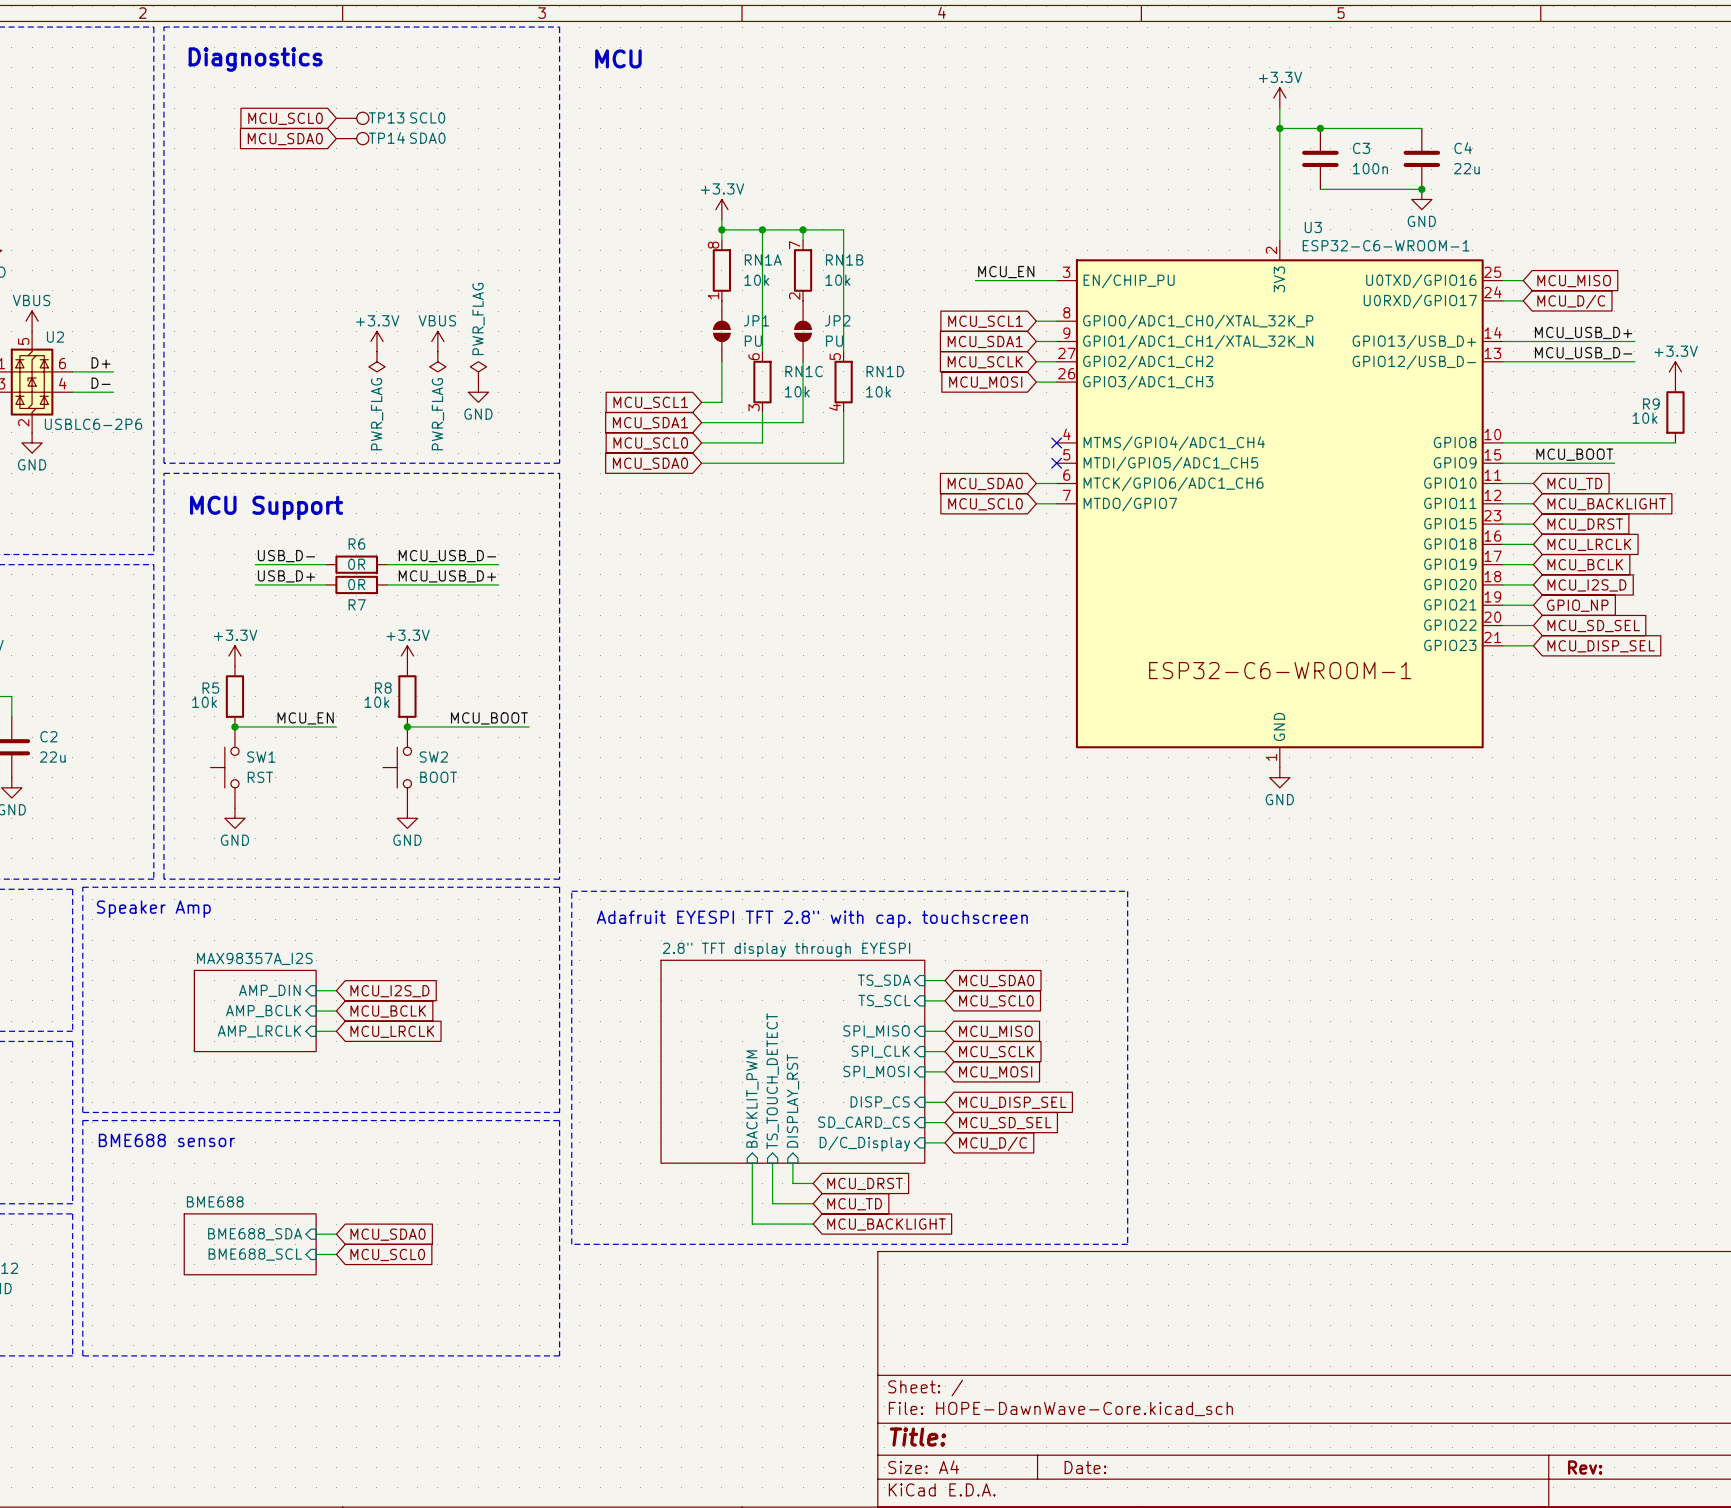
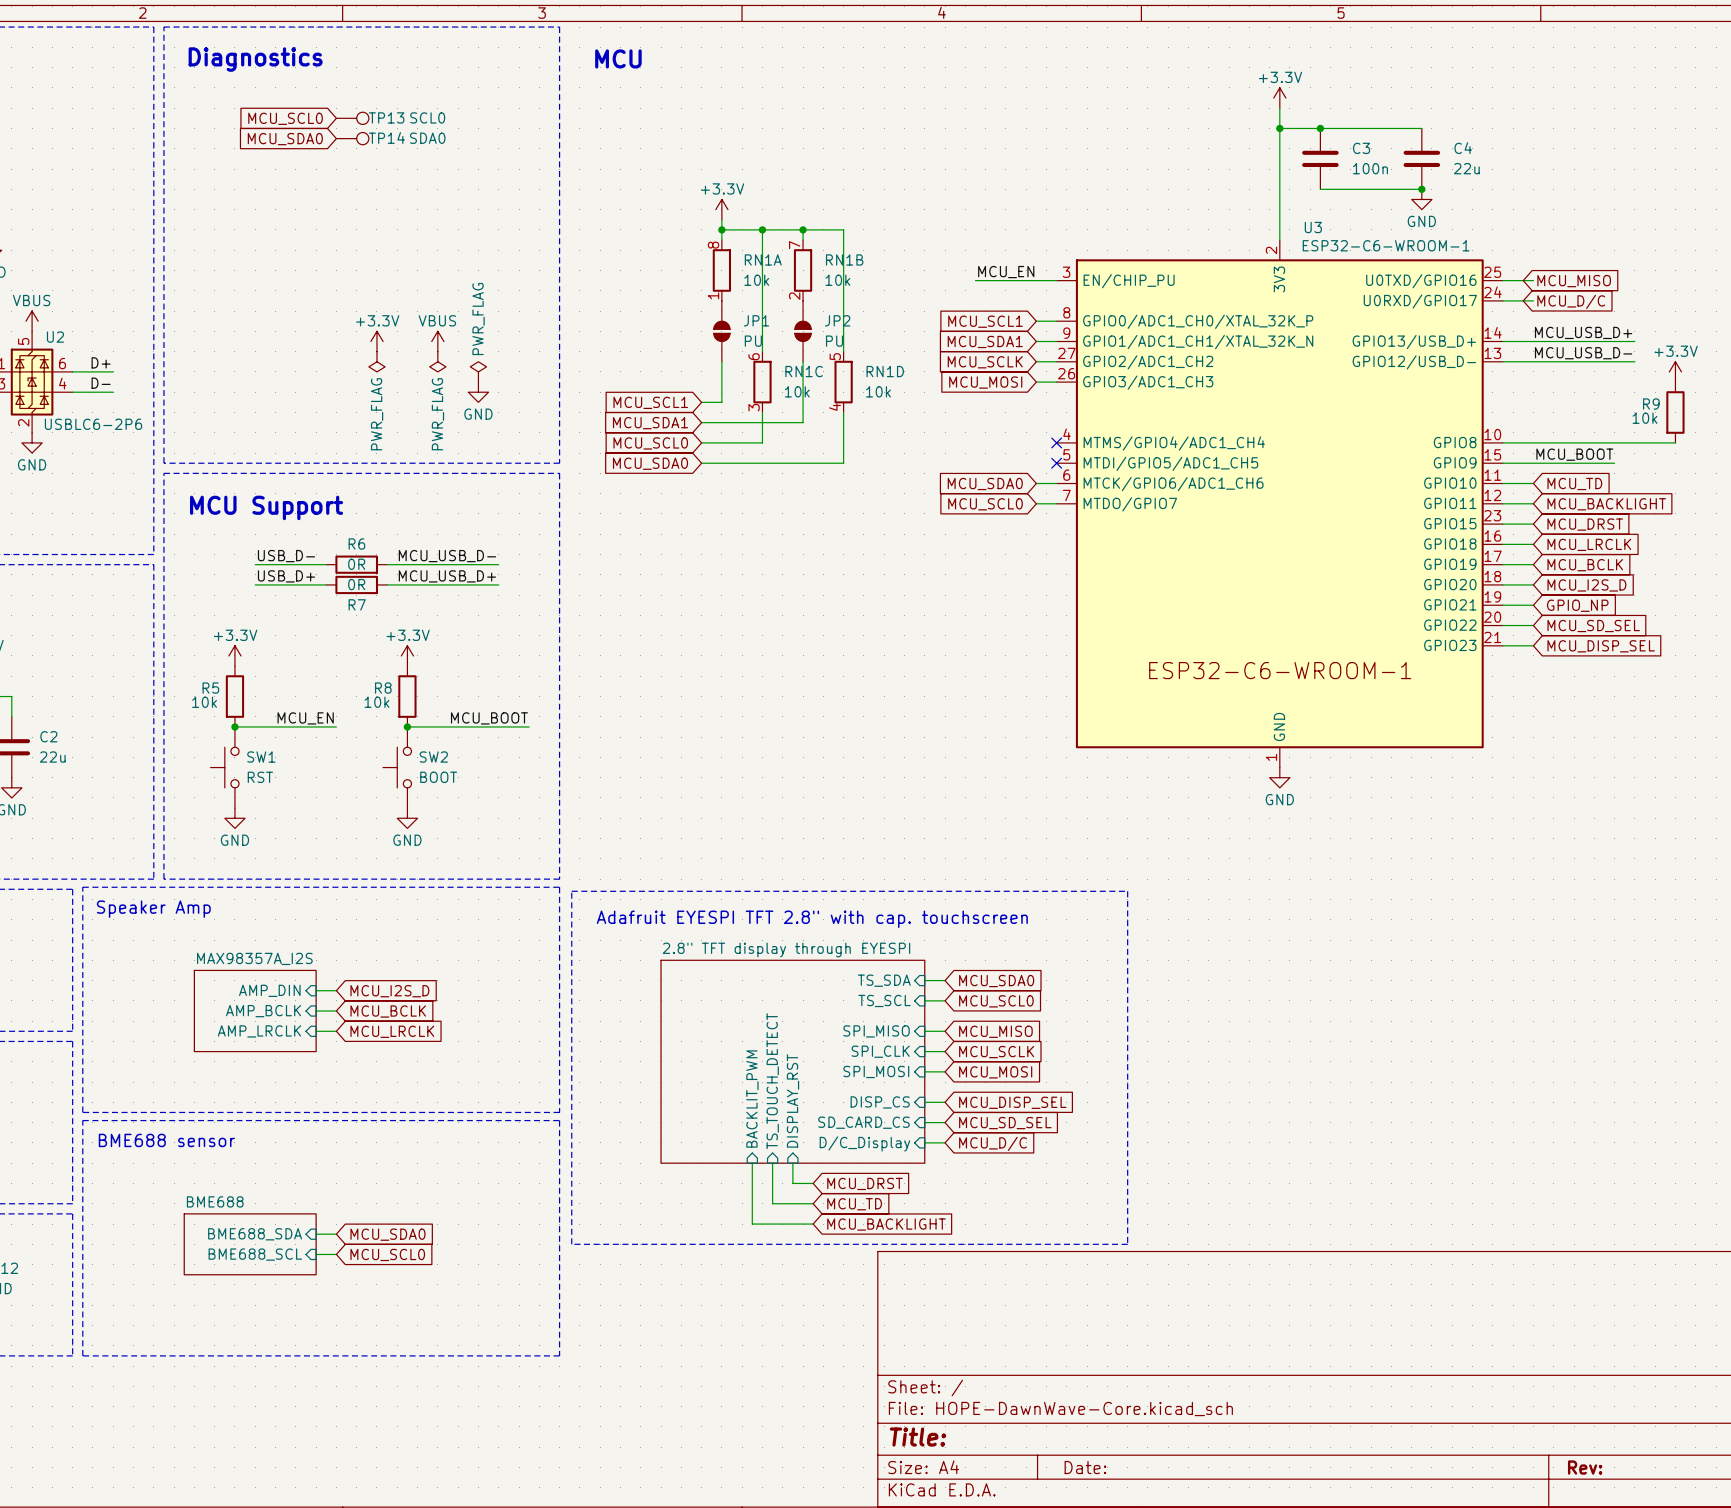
wire: none -> (1523, 280) (1533, 280)
wire: none -> (1523, 300) (1533, 300)

